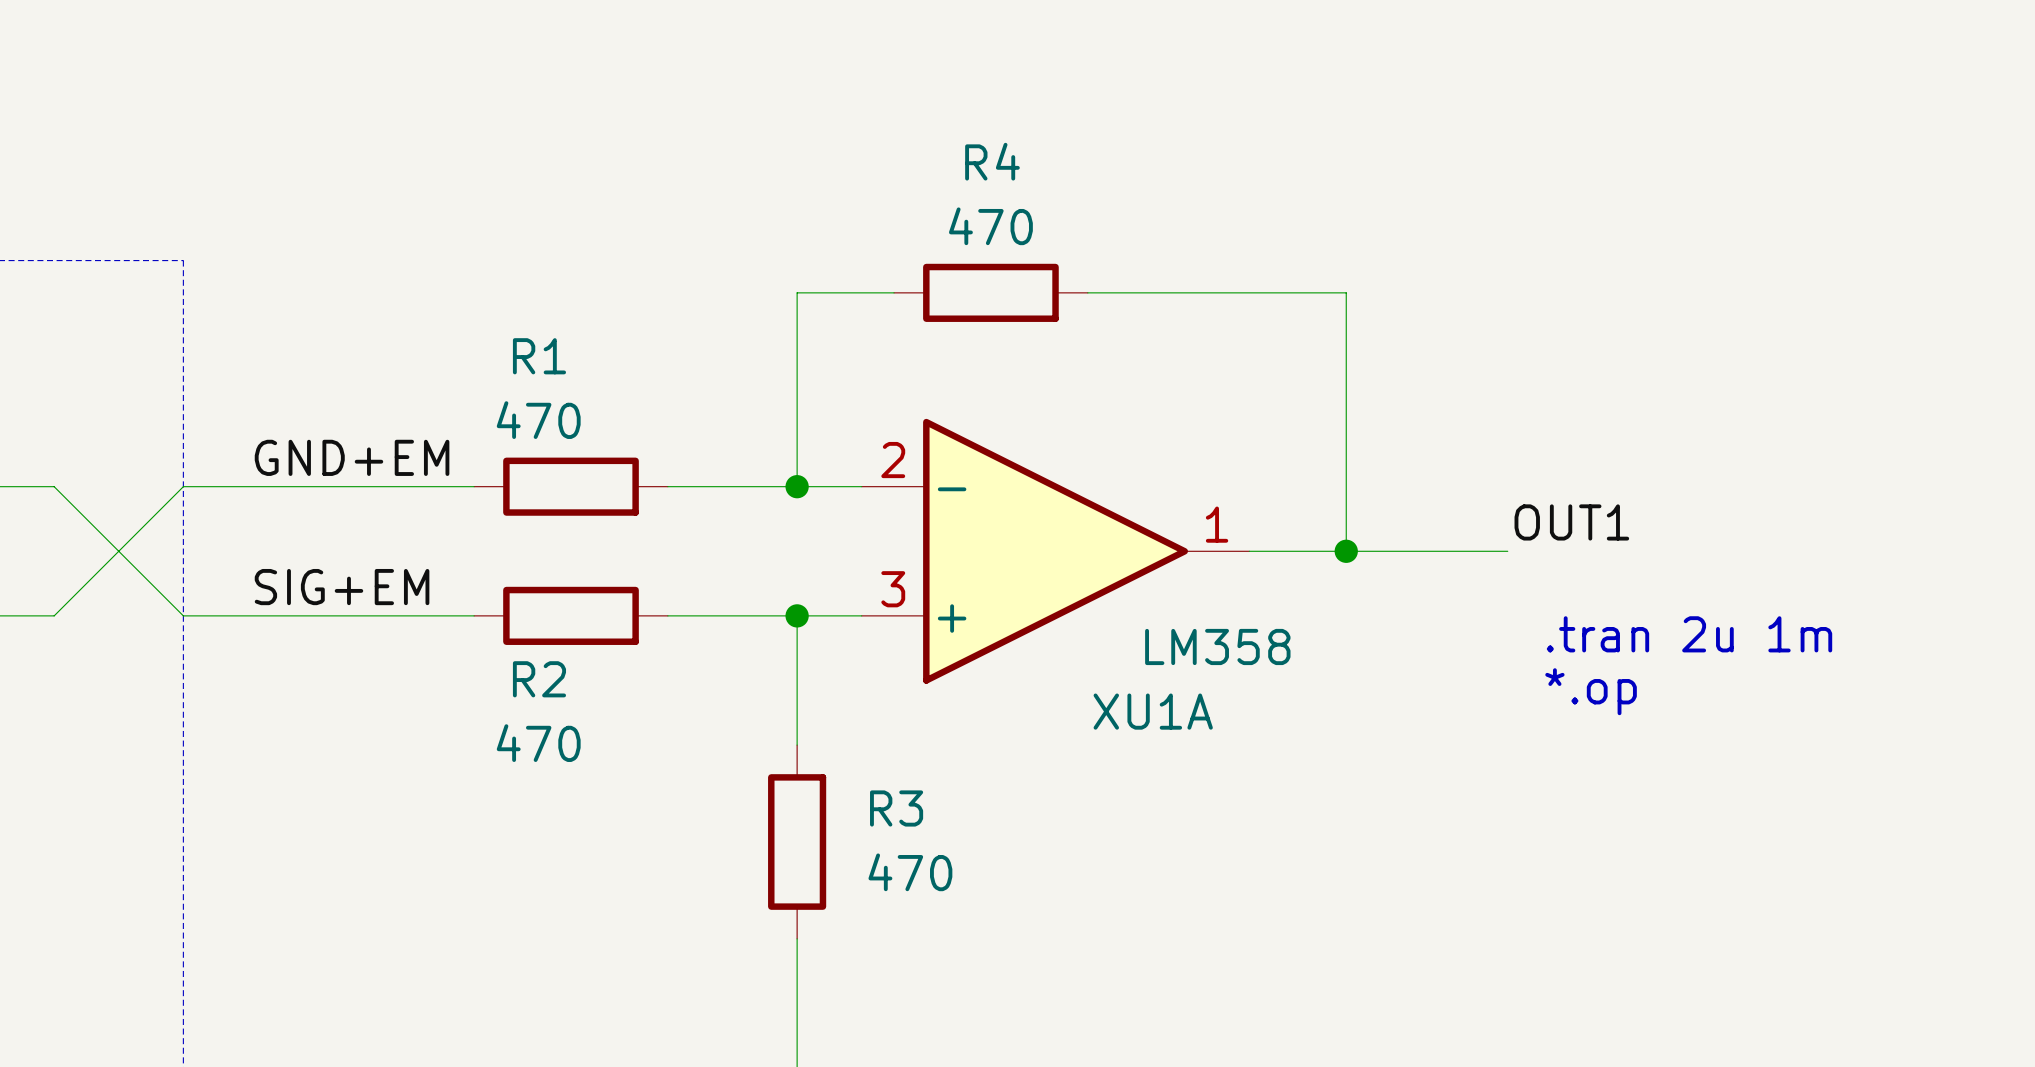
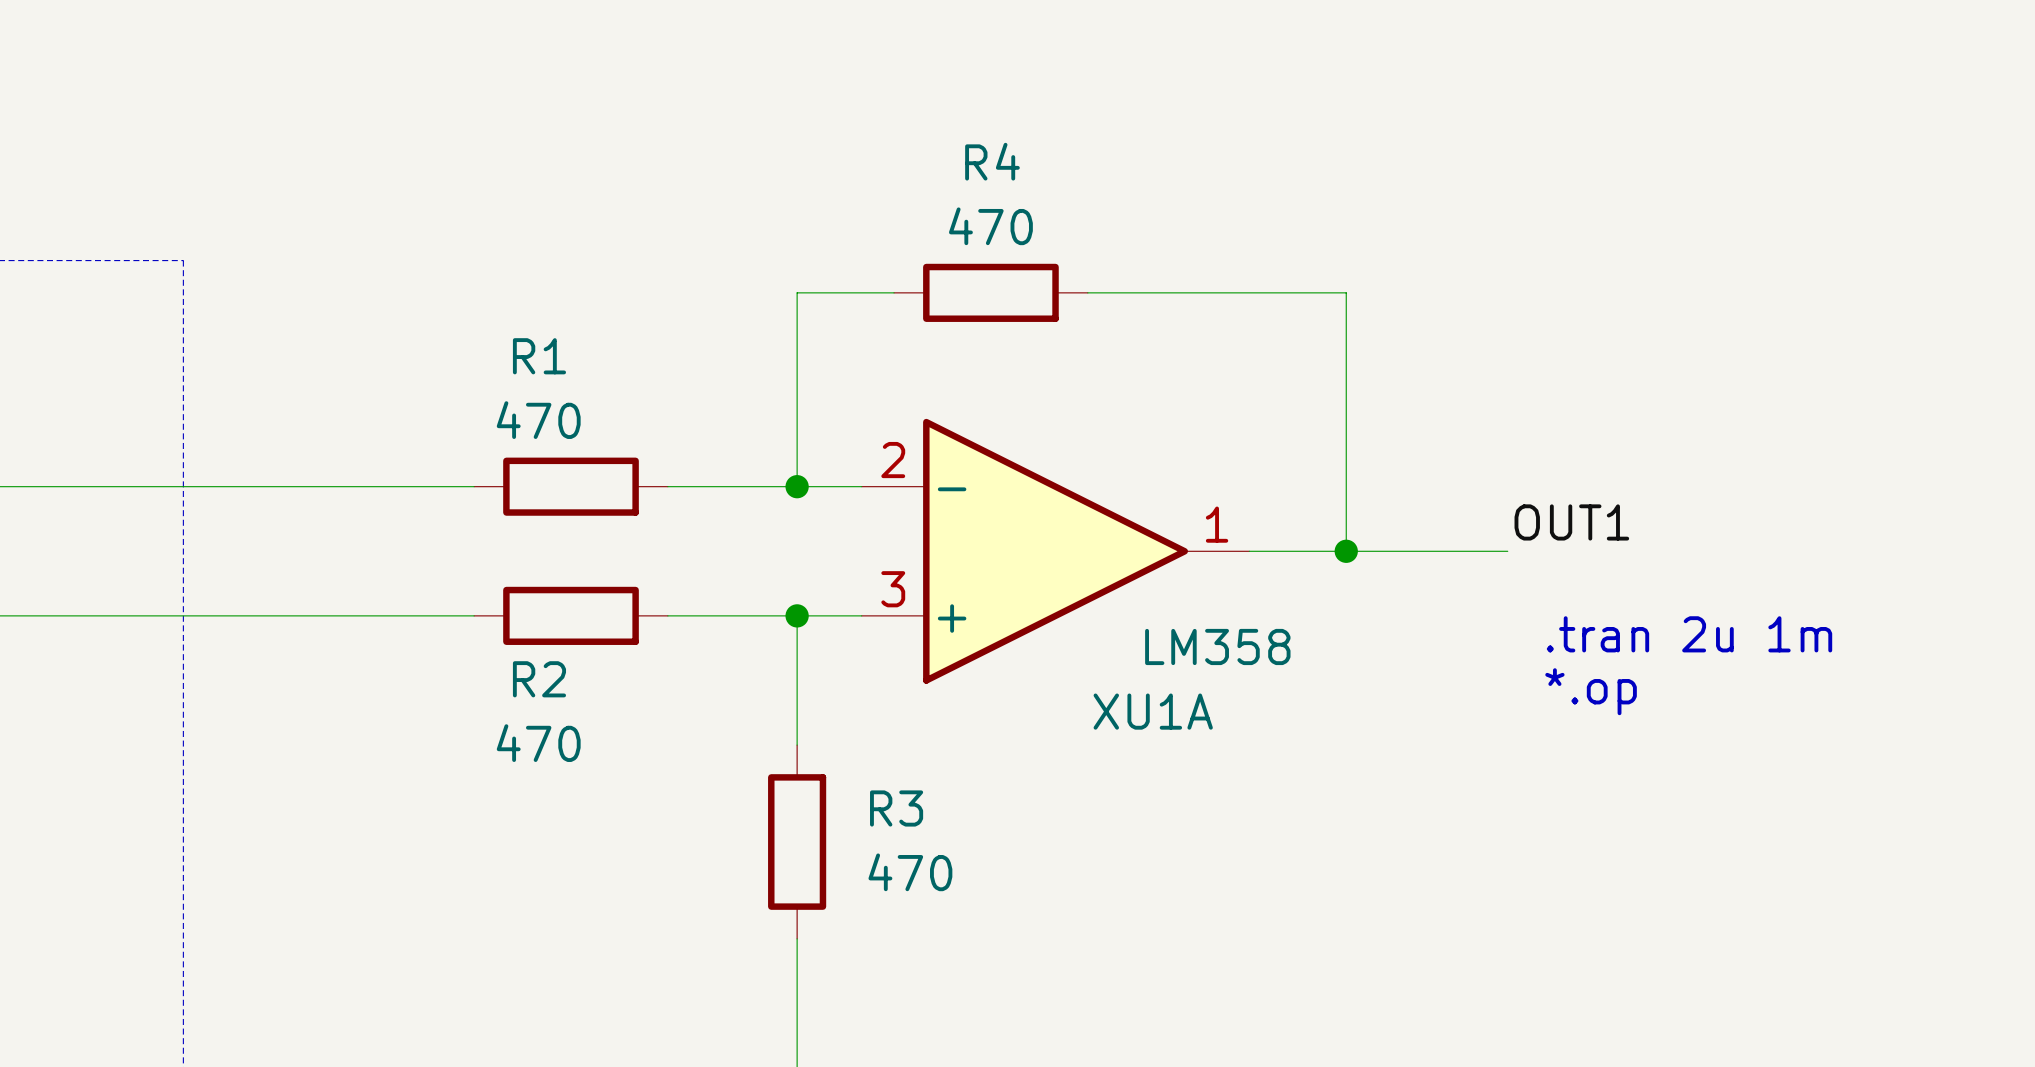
label: GND+EM (352, 457) -> none
wire: (54, 486) (183, 615) -> (54, 486) (183, 486)
wire: (183, 486) (54, 615) -> (183, 615) (54, 615)
label: SIG+EM (342, 587) -> none

